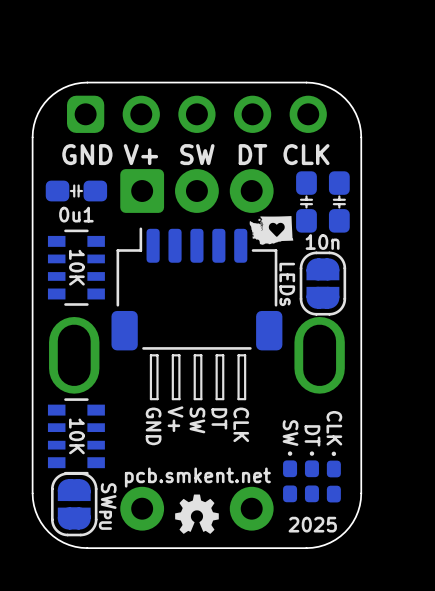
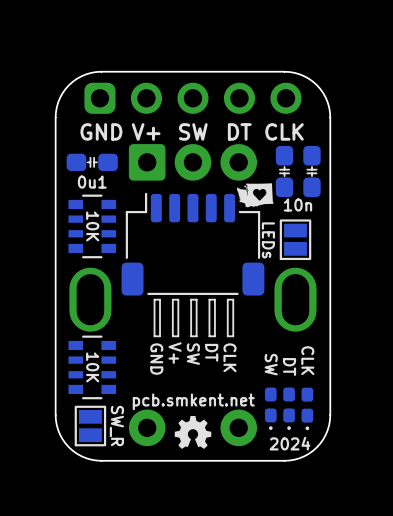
part footprint: [299, 251, 347, 316] -> [279, 219, 312, 261]
part footprint: [51, 472, 98, 537] -> [74, 405, 107, 447]
part rotation: 0° (290, 476) -> 180° (270, 408)
part rotation: 0° (311, 476) -> 180° (289, 408)
part rotation: 0° (333, 477) -> 180° (307, 408)
text: SWPU (107, 506) -> SW_R (116, 426)
text: 2025 (312, 524) -> 2024 (290, 443)

